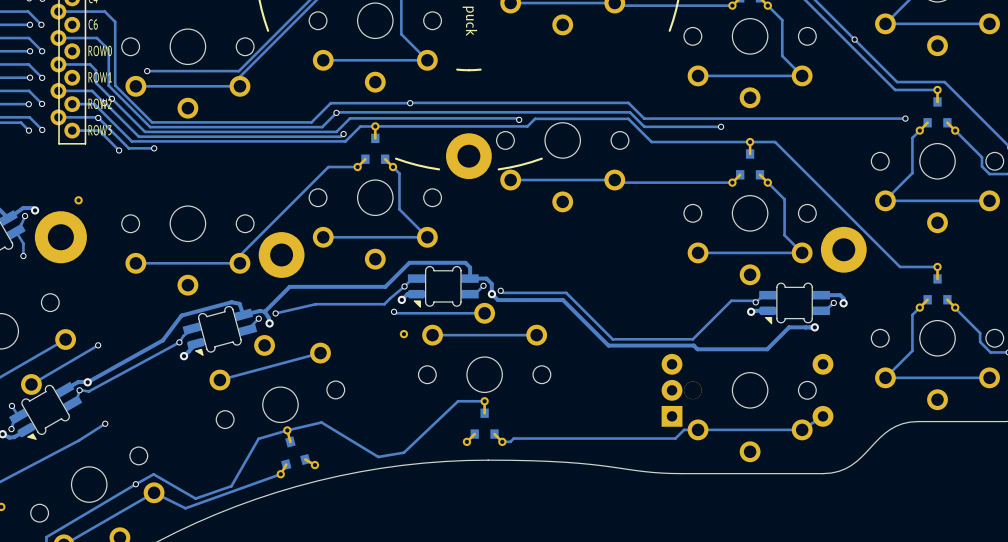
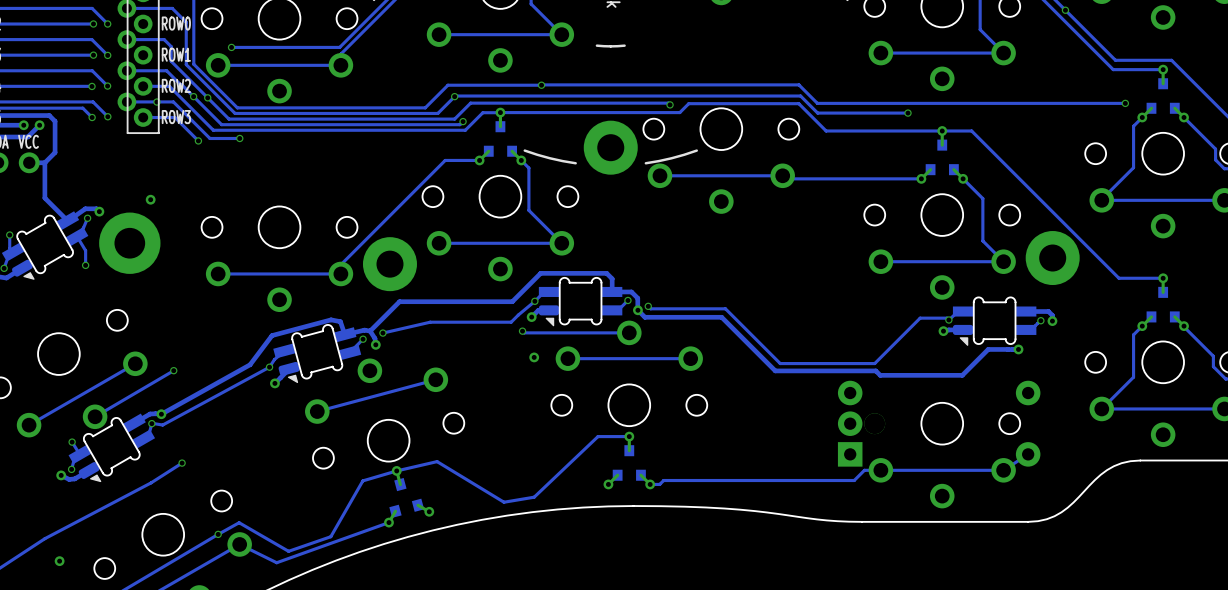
via: (111, 98) -> none
via: (104, 103) -> none
via: none -> (193, 96)
via: none -> (207, 97)
via: none -> (156, 102)
via: (98, 117) -> none

